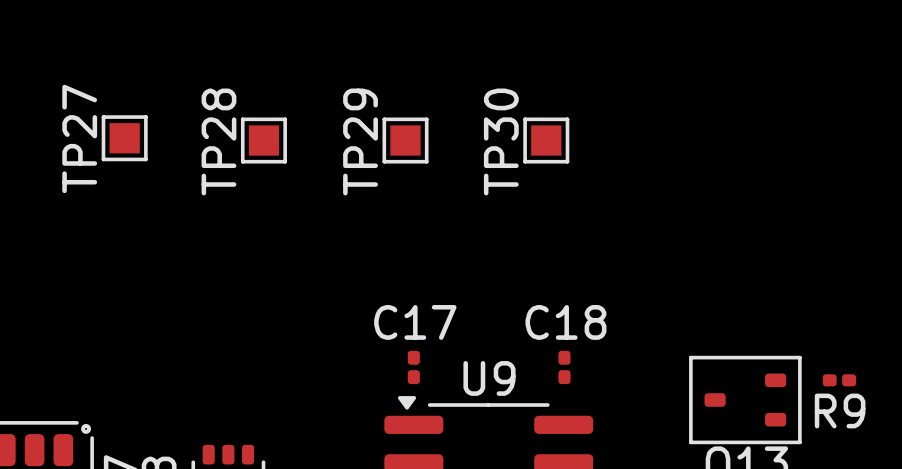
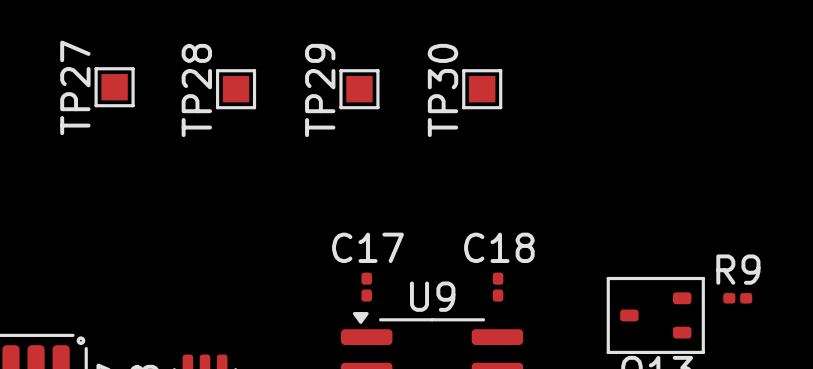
R9 name position: R9 (840, 410) -> R9 (738, 269)

